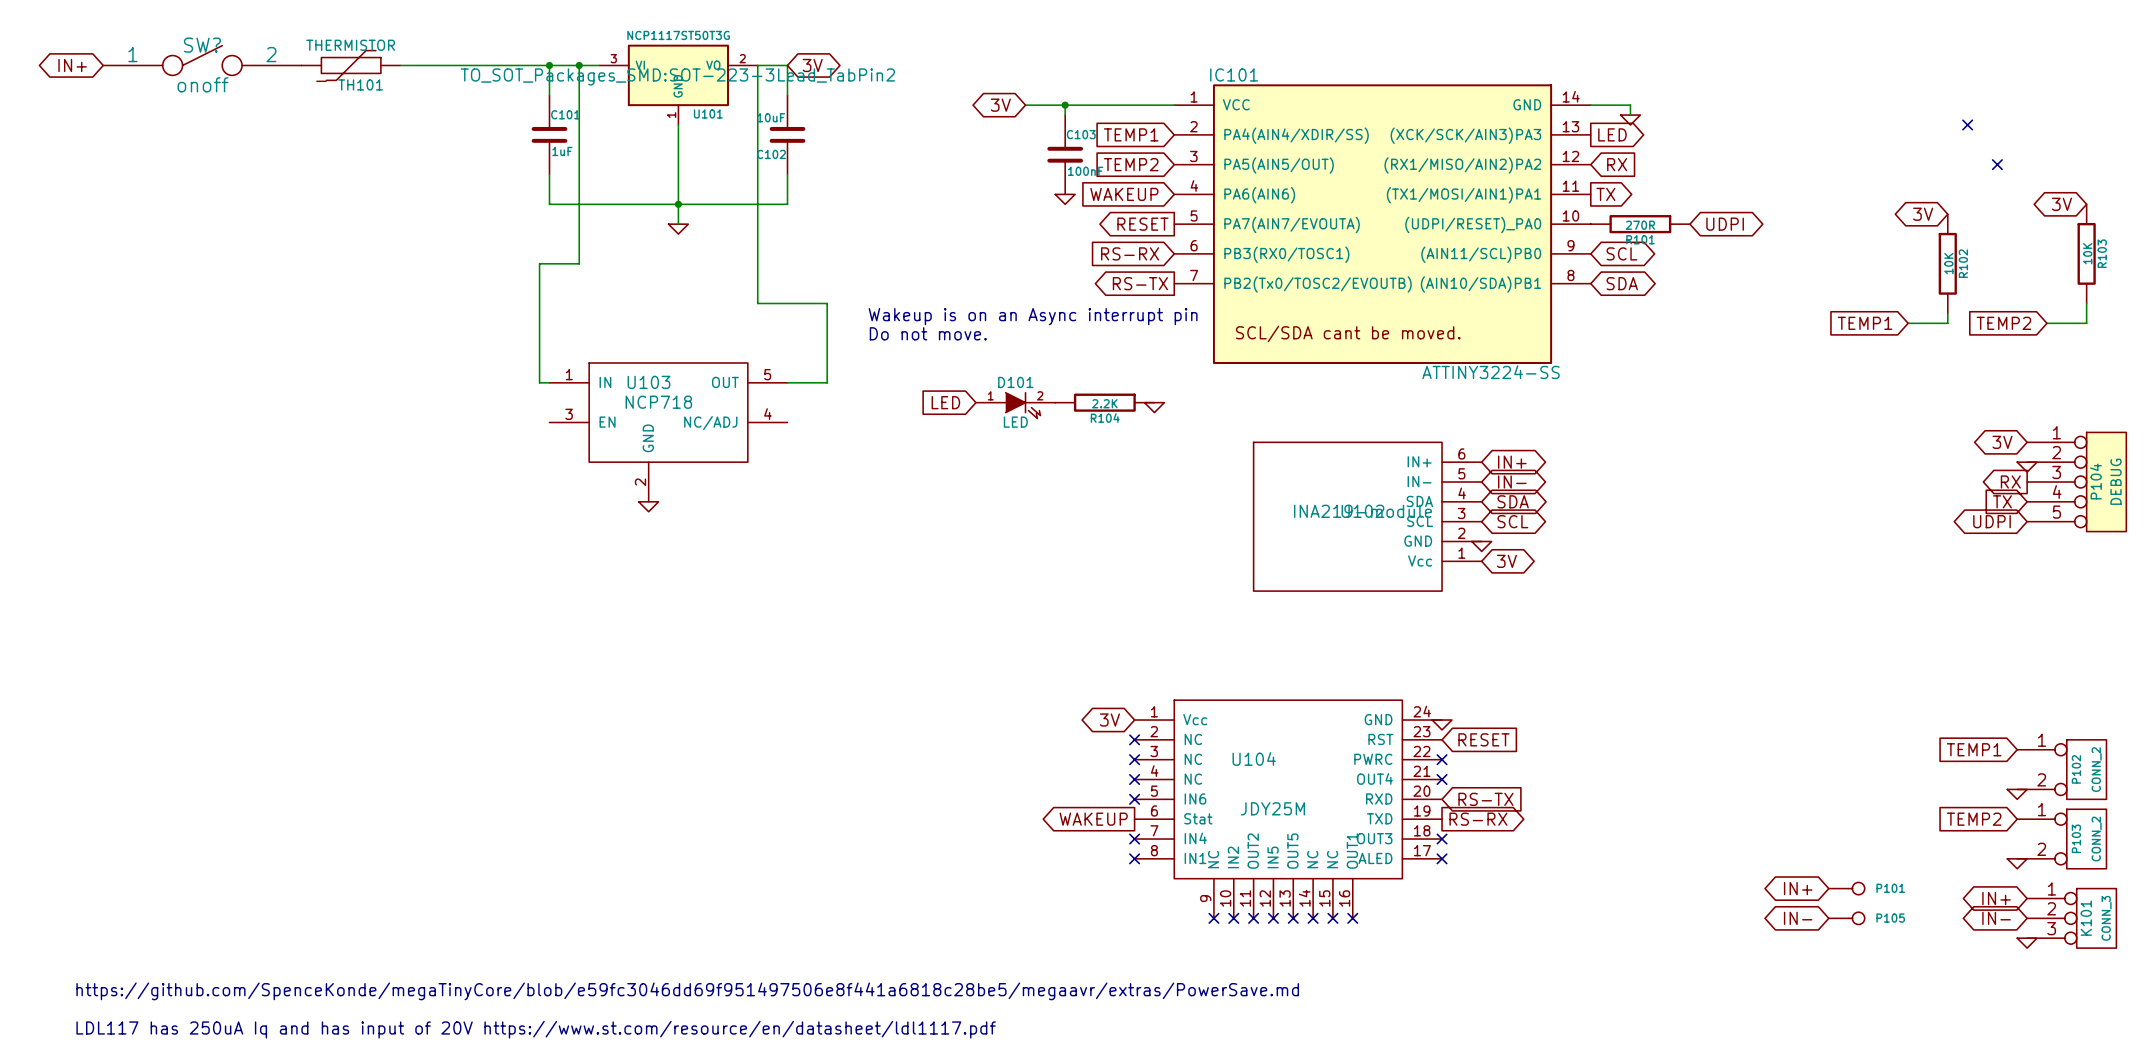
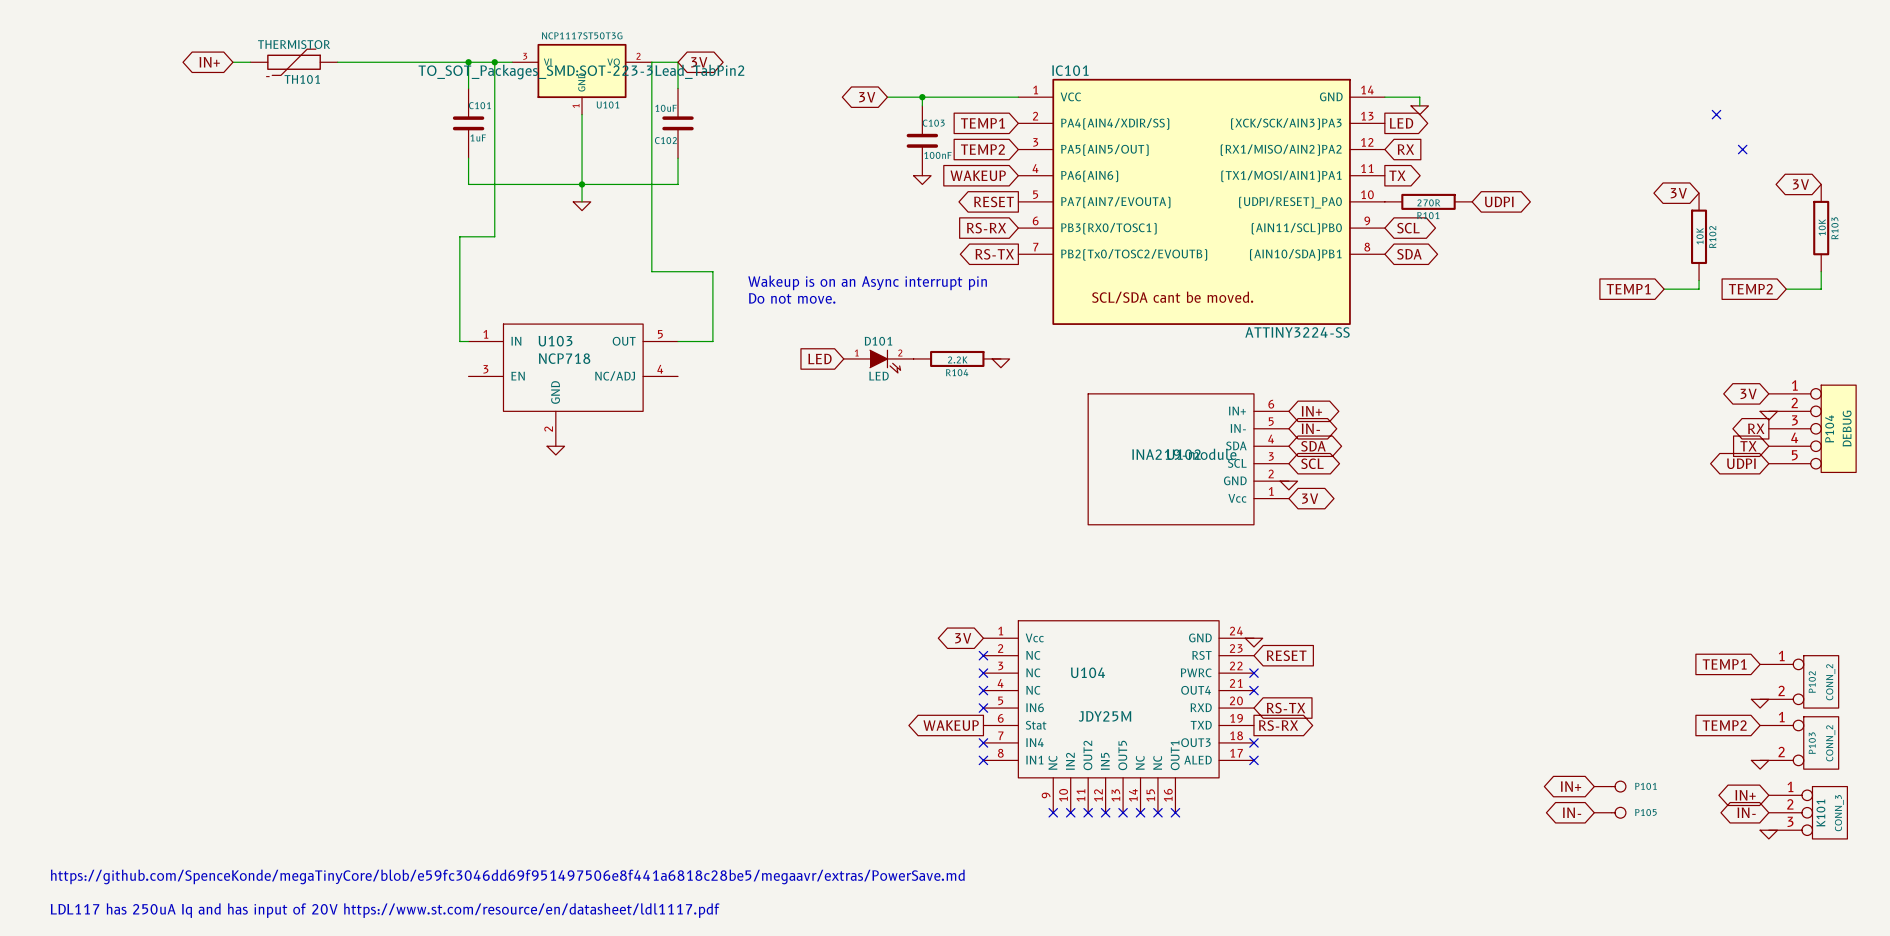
SW?: onoff (202, 60) -> none
global label position: IN+ (72, 65) -> IN+ (209, 62)

